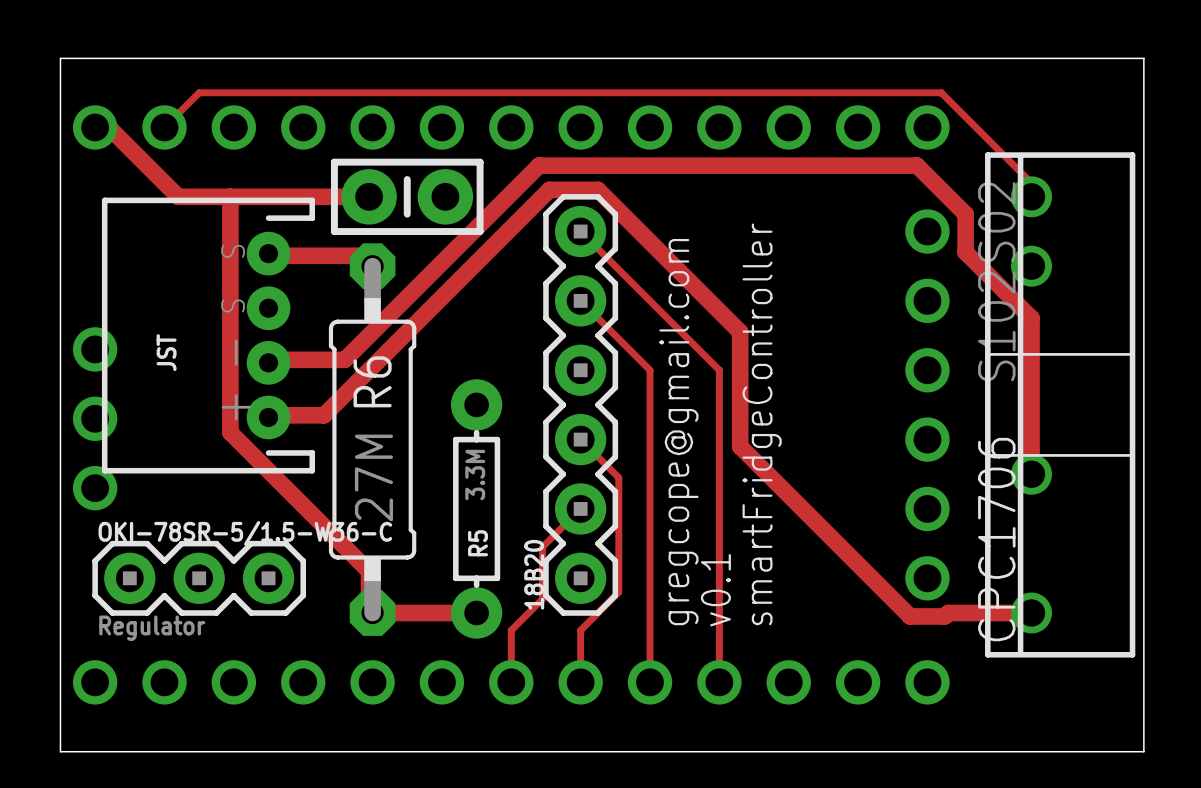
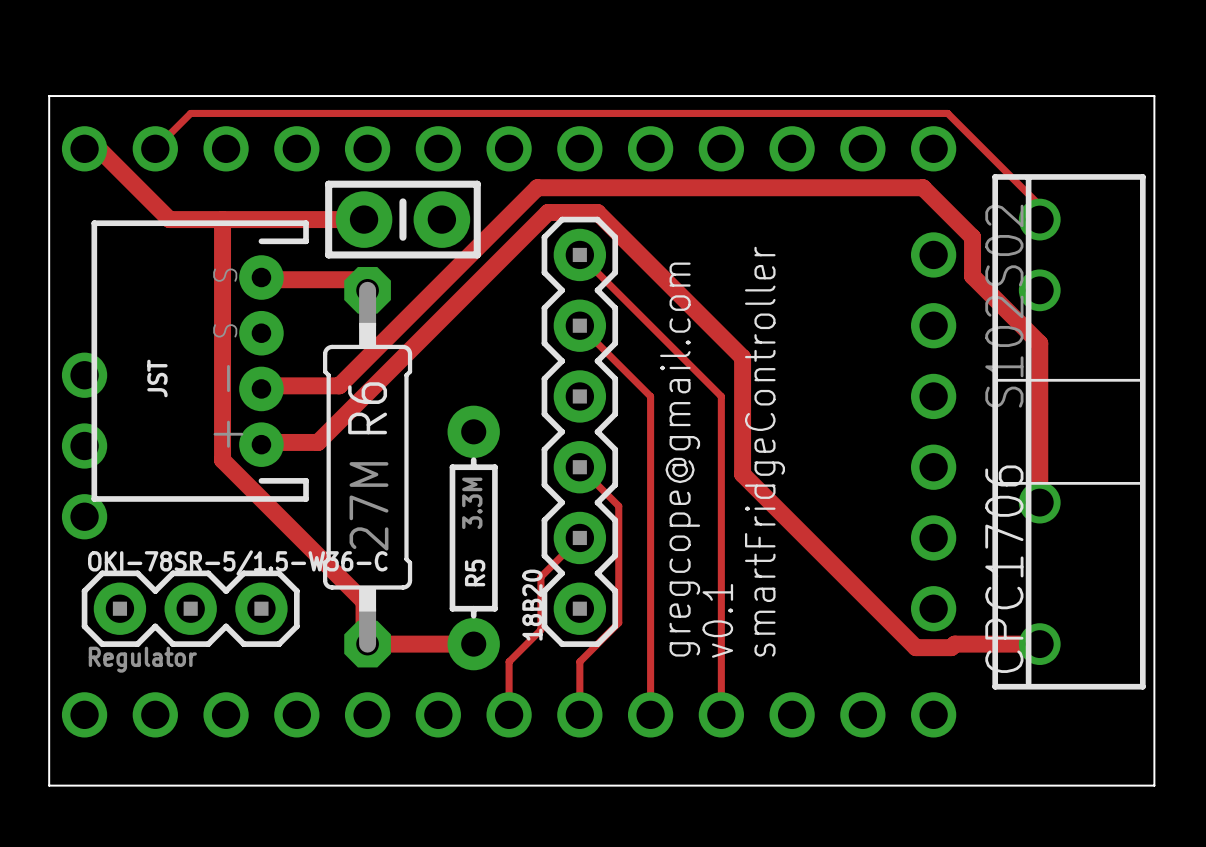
board edge: (60, 75) (60, 58) (1143, 58) (1143, 75) -> (49, 96) (1154, 96)

